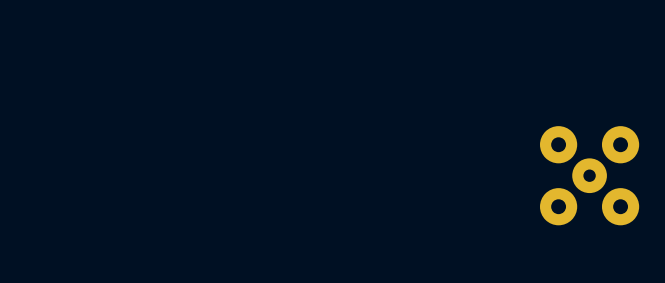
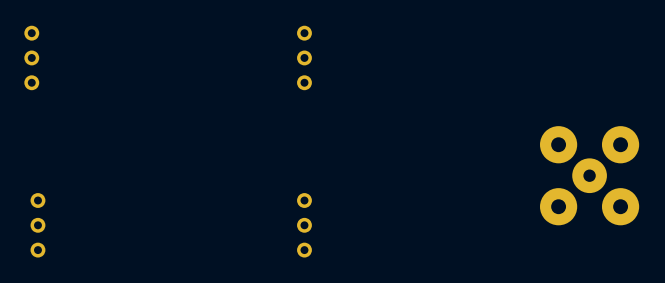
part: none -> (31, 57)
part: none -> (304, 57)
part: none -> (37, 225)
part: none -> (304, 225)

